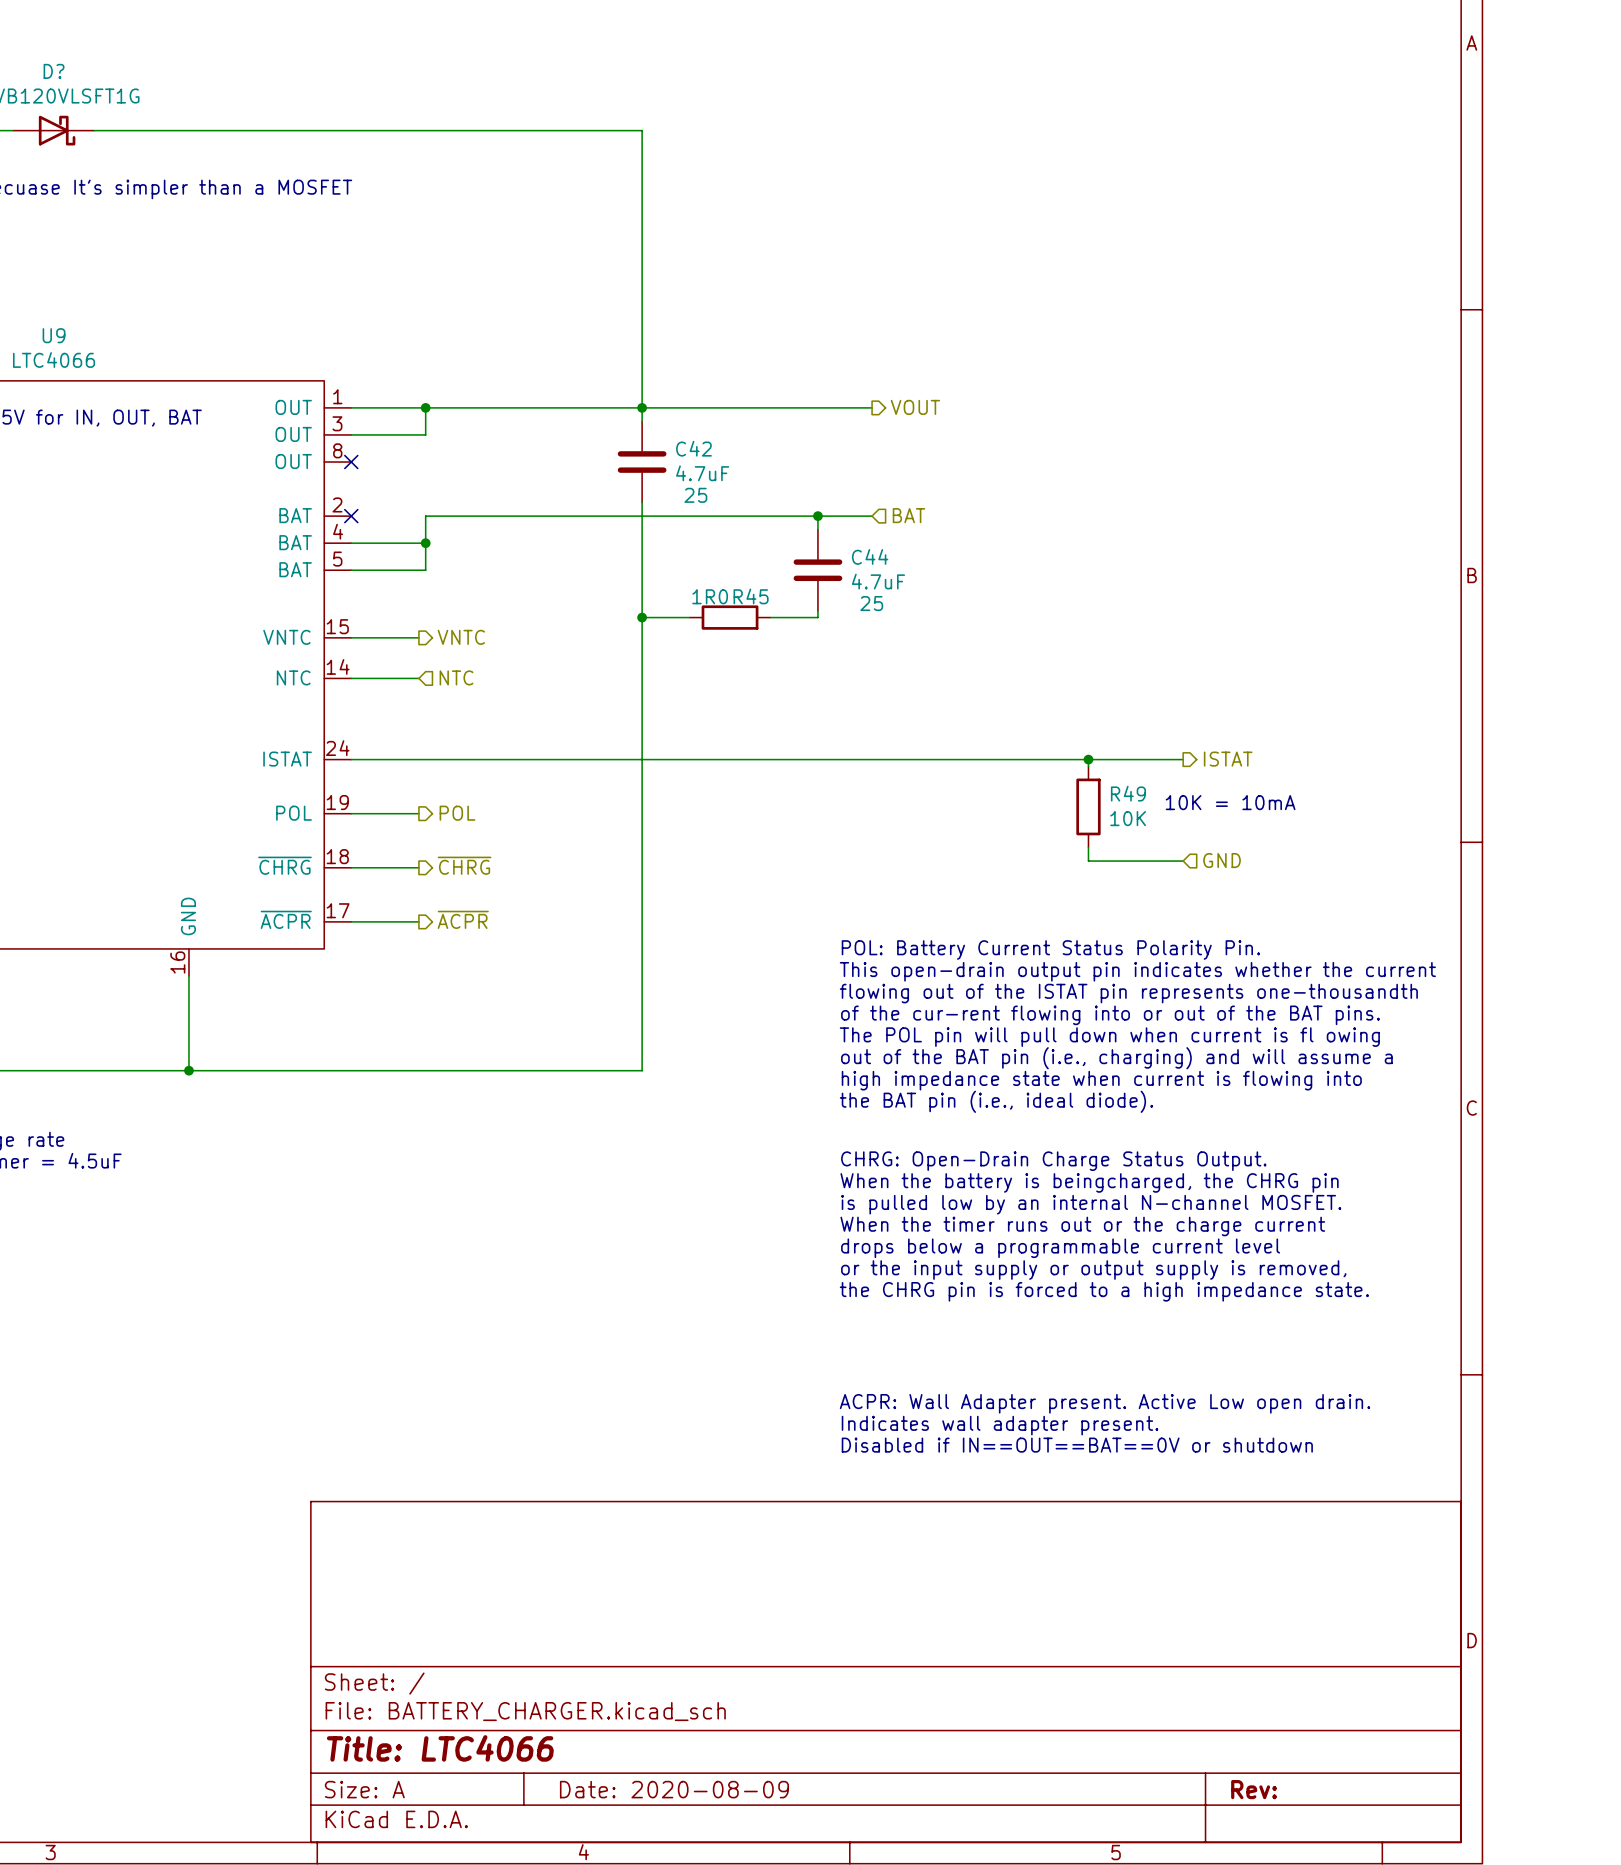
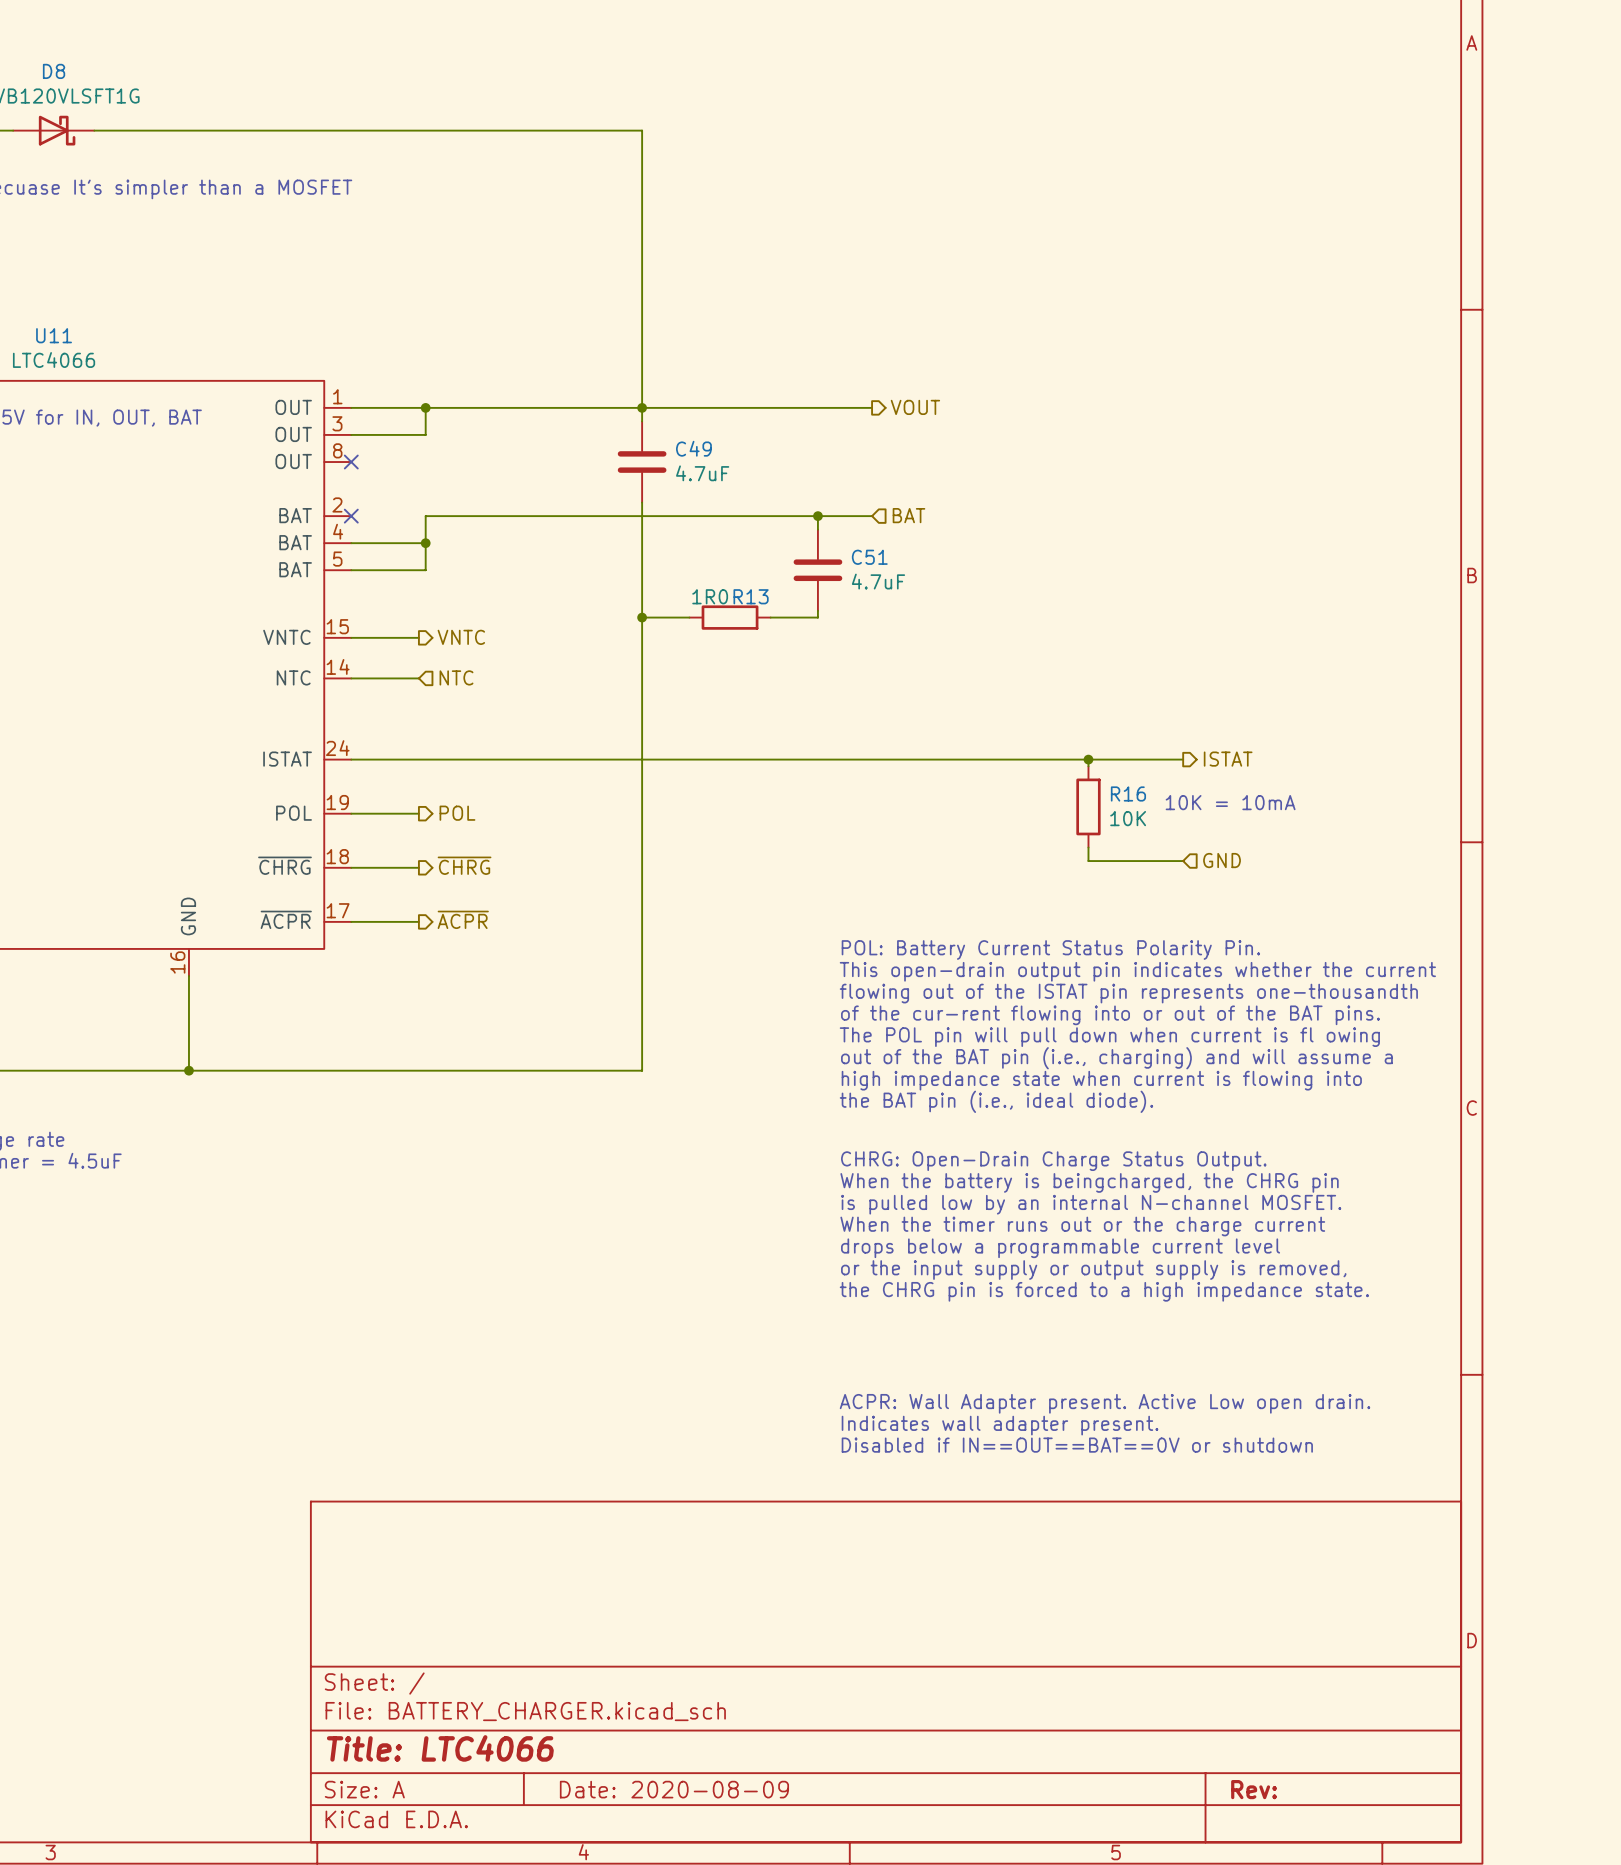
D? name: D? (54, 71) -> D8 (54, 71)
U9 name: U9 (54, 335) -> U11 (54, 335)
C42 name: C42 (693, 448) -> C49 (693, 448)
C42 text: 25 (695, 495) -> none
C44 name: C44 (870, 556) -> C51 (869, 557)
R45 name: R45 (751, 596) -> R13 (751, 596)
C44 text: 25 (871, 603) -> none
R49 name: R49 (1128, 793) -> R16 (1128, 793)

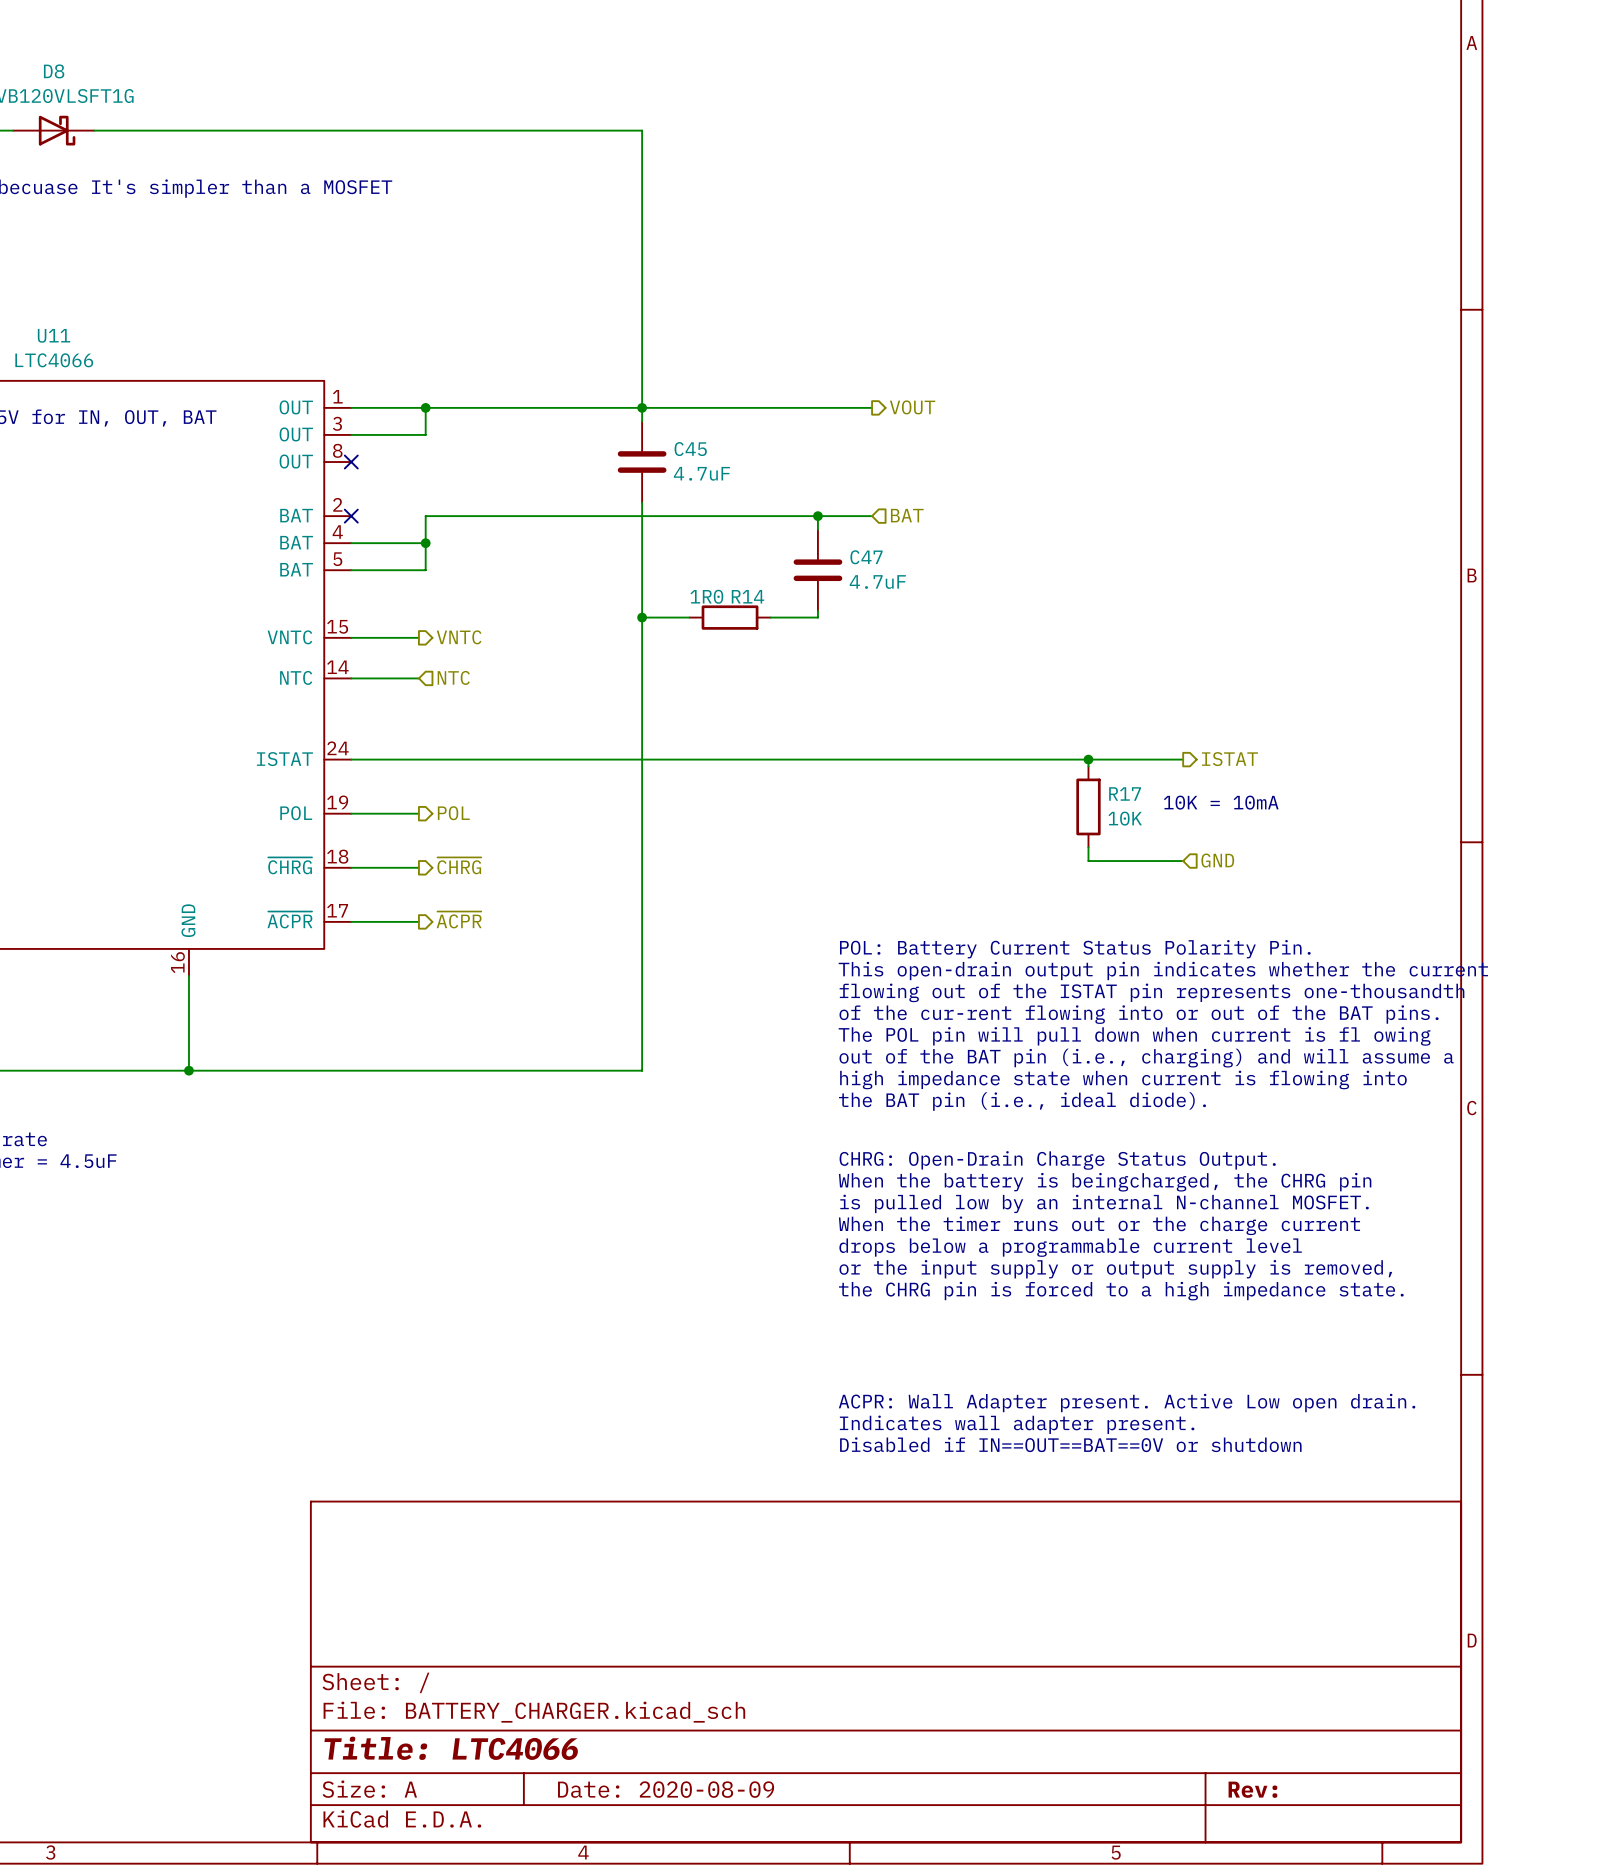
C49 name: C49 (693, 448) -> C45 (690, 449)
C51 name: C51 (869, 557) -> C47 (866, 557)
R13 name: R13 (751, 596) -> R14 (747, 596)
R16 name: R16 (1128, 793) -> R17 (1125, 793)

